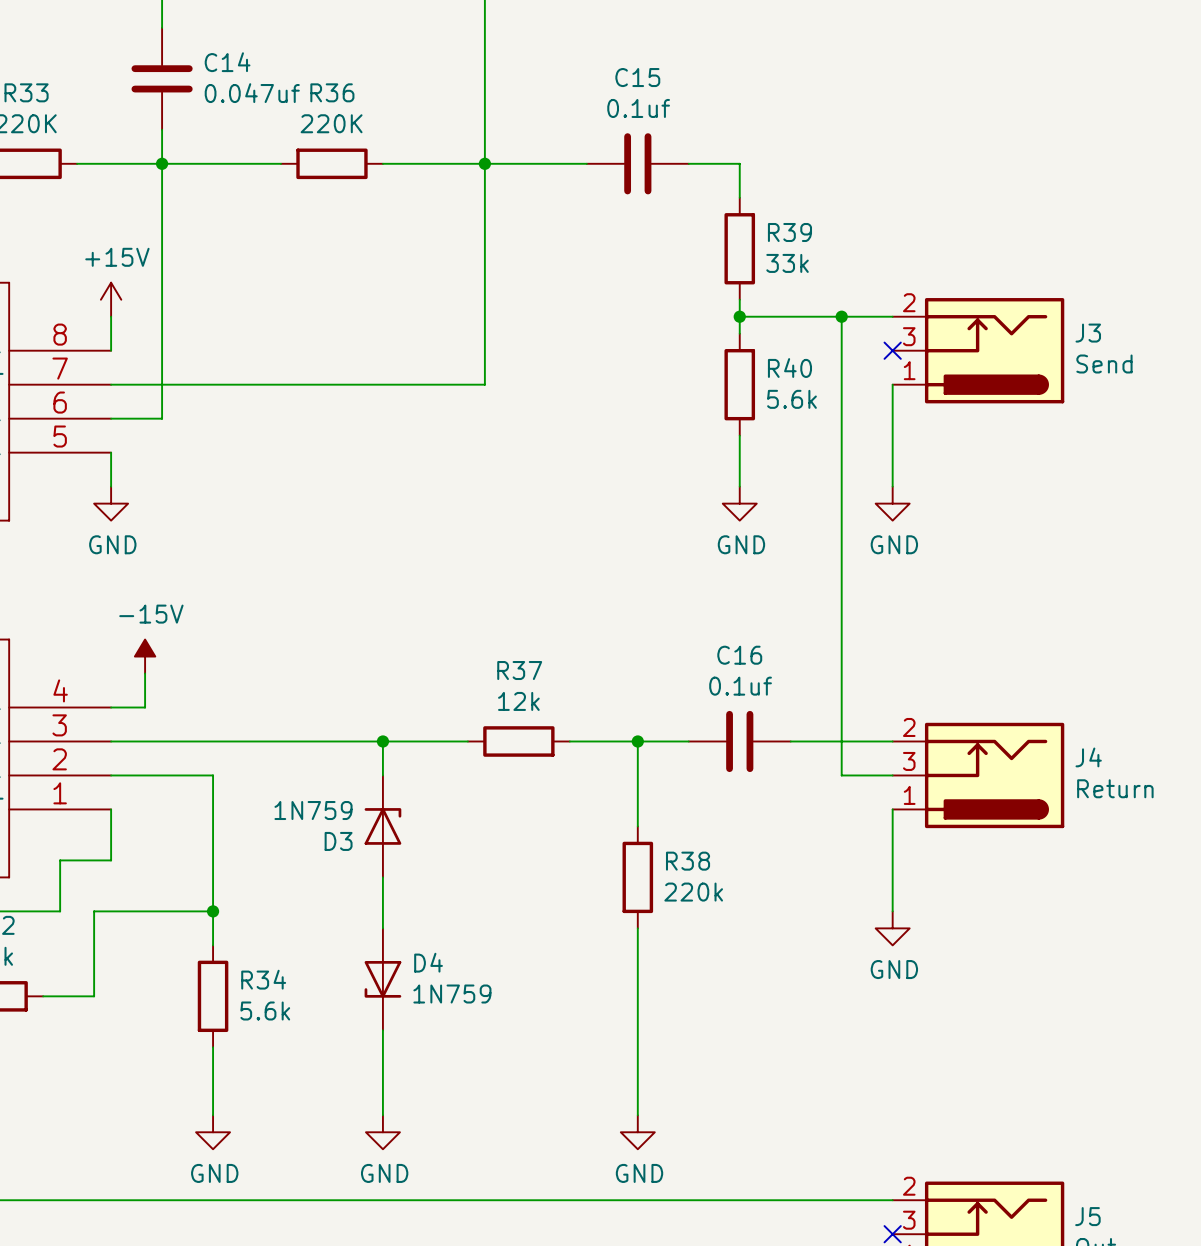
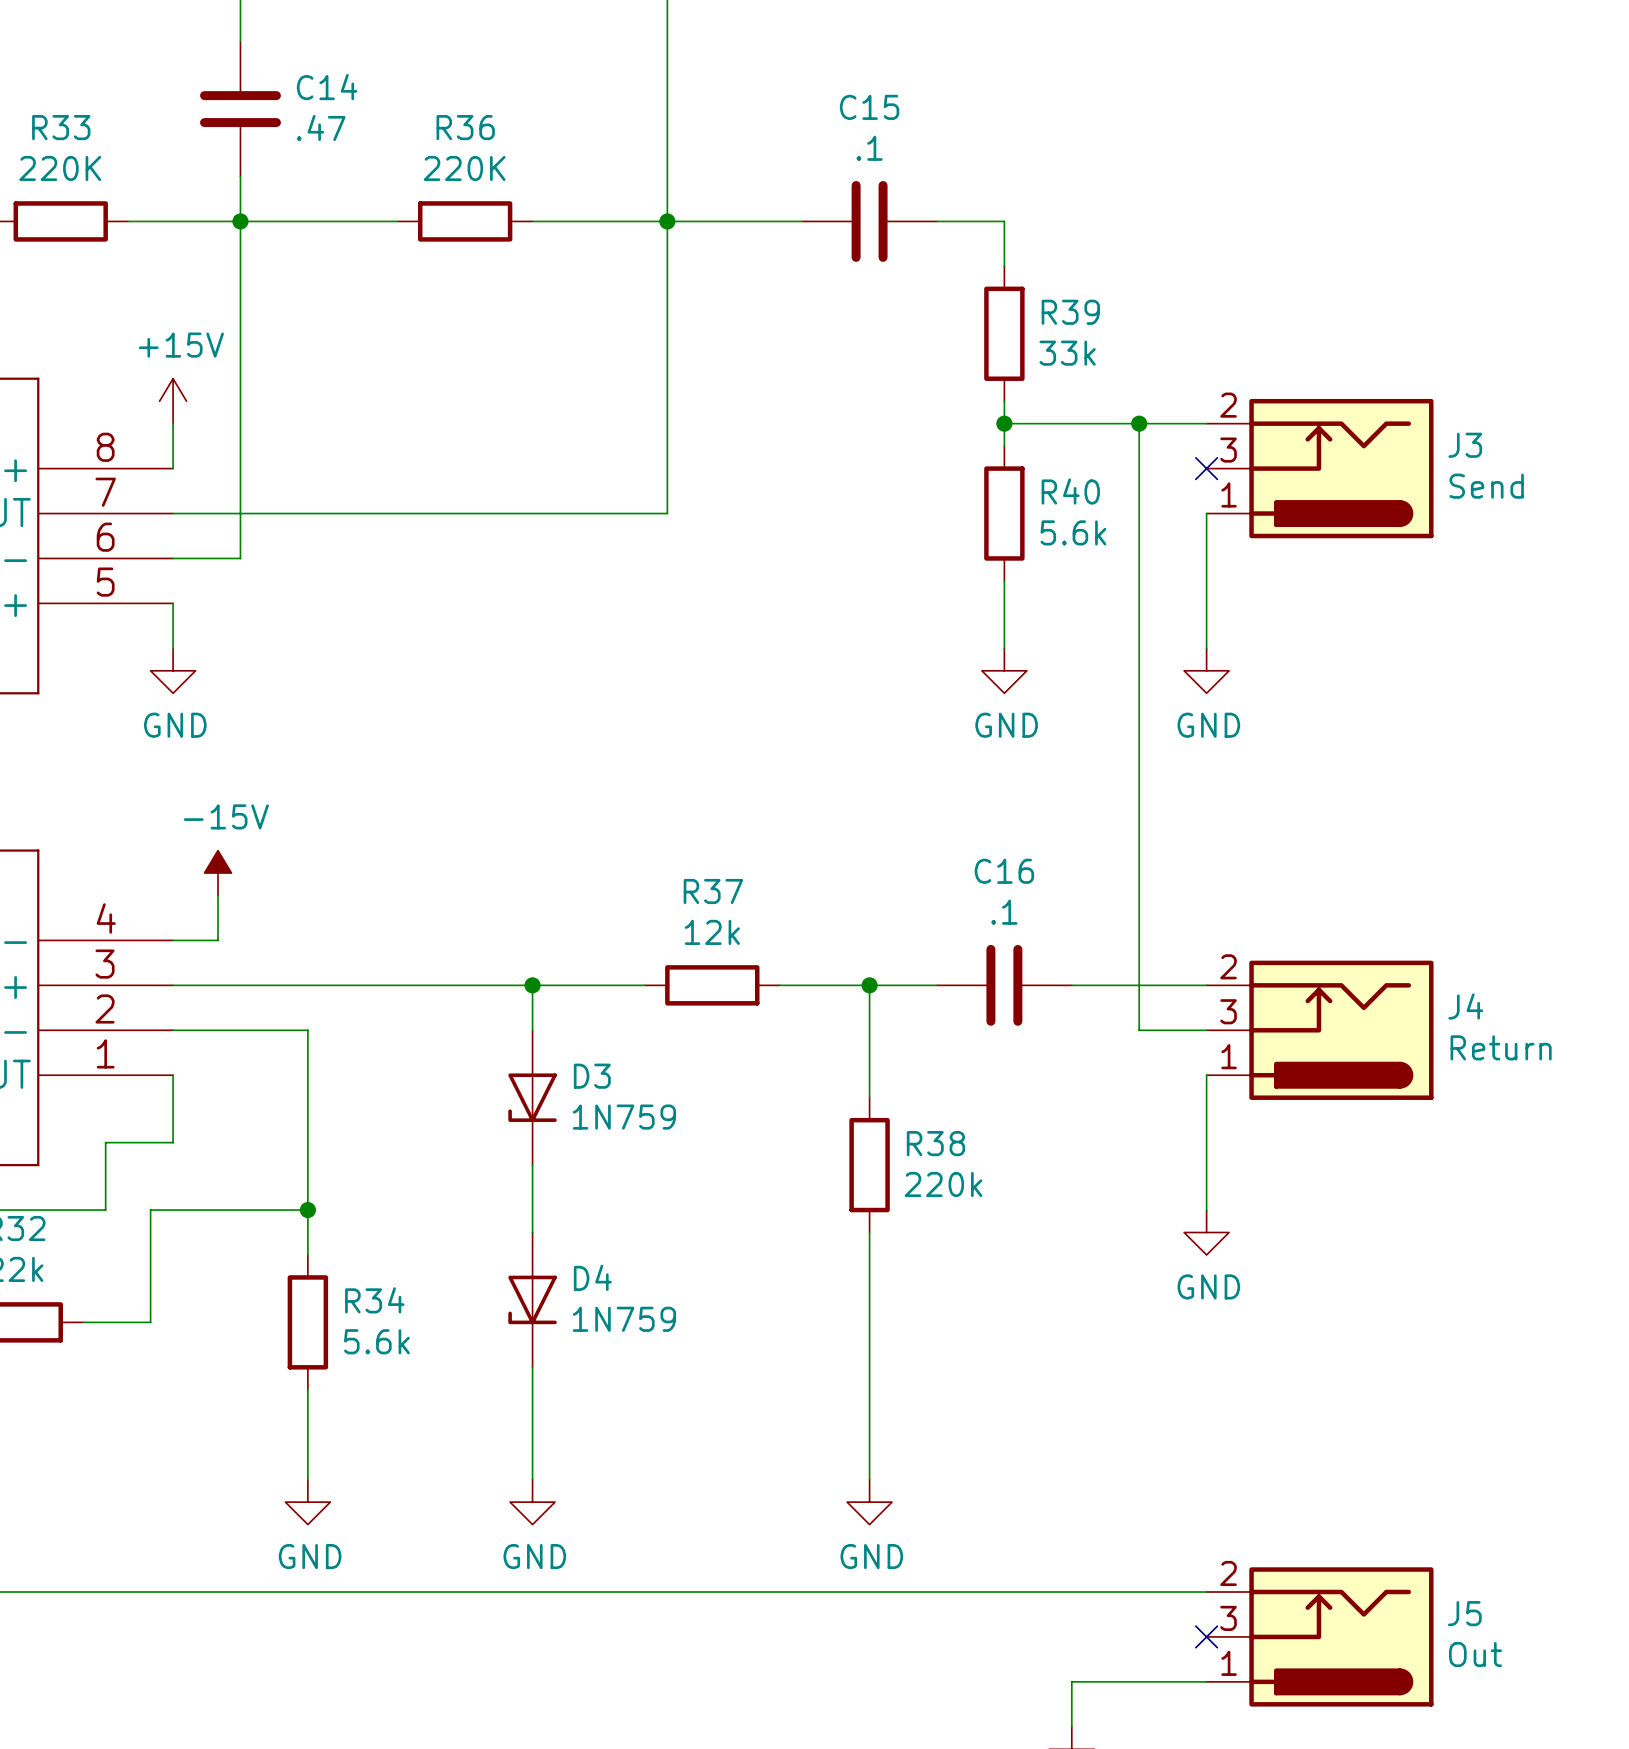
C14 value: 0.047uf (252, 93) -> .47 (321, 127)
C15 value: 0.1uf (638, 108) -> .1 (869, 148)
C16 value: 0.1uf (740, 686) -> .1 (1004, 912)
D3 rotation: 0° (382, 826) -> 180° (532, 1097)

